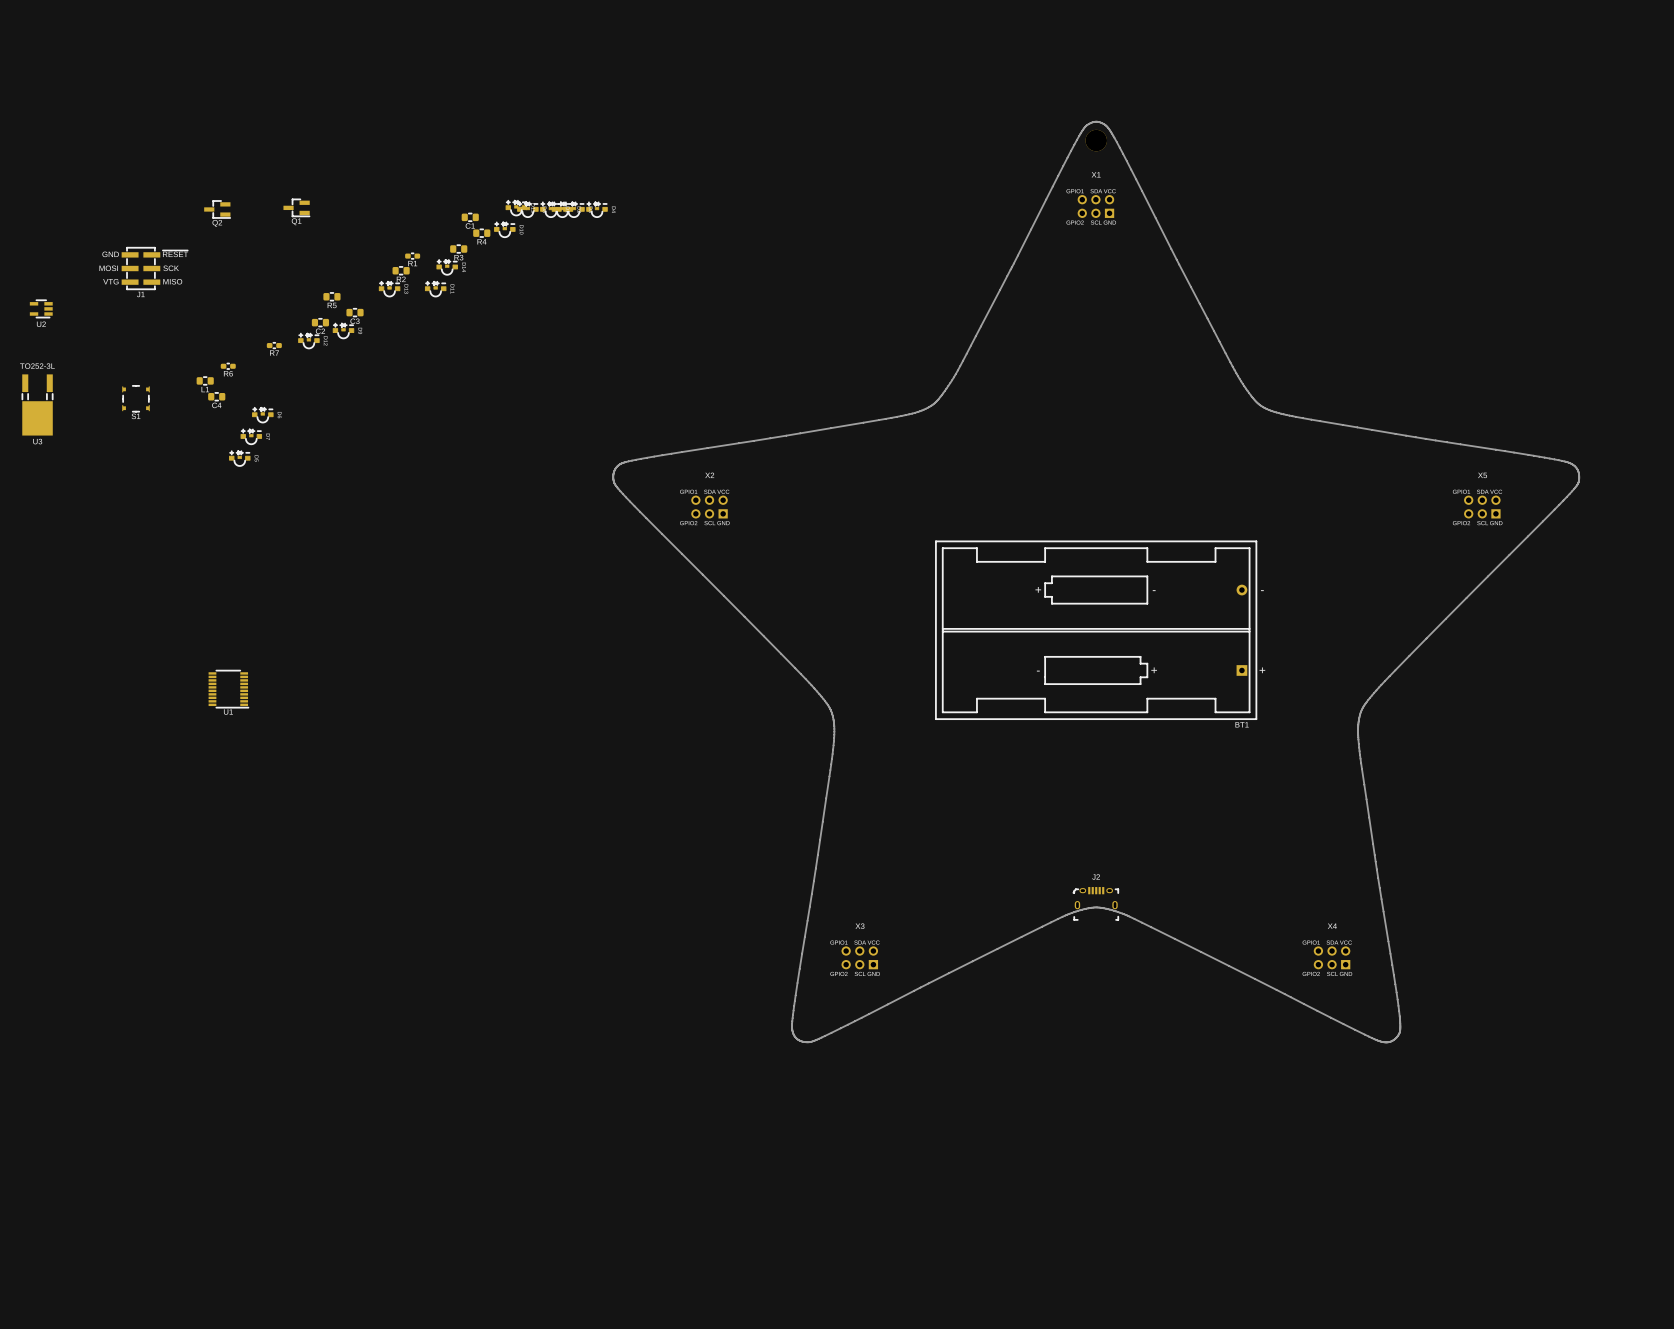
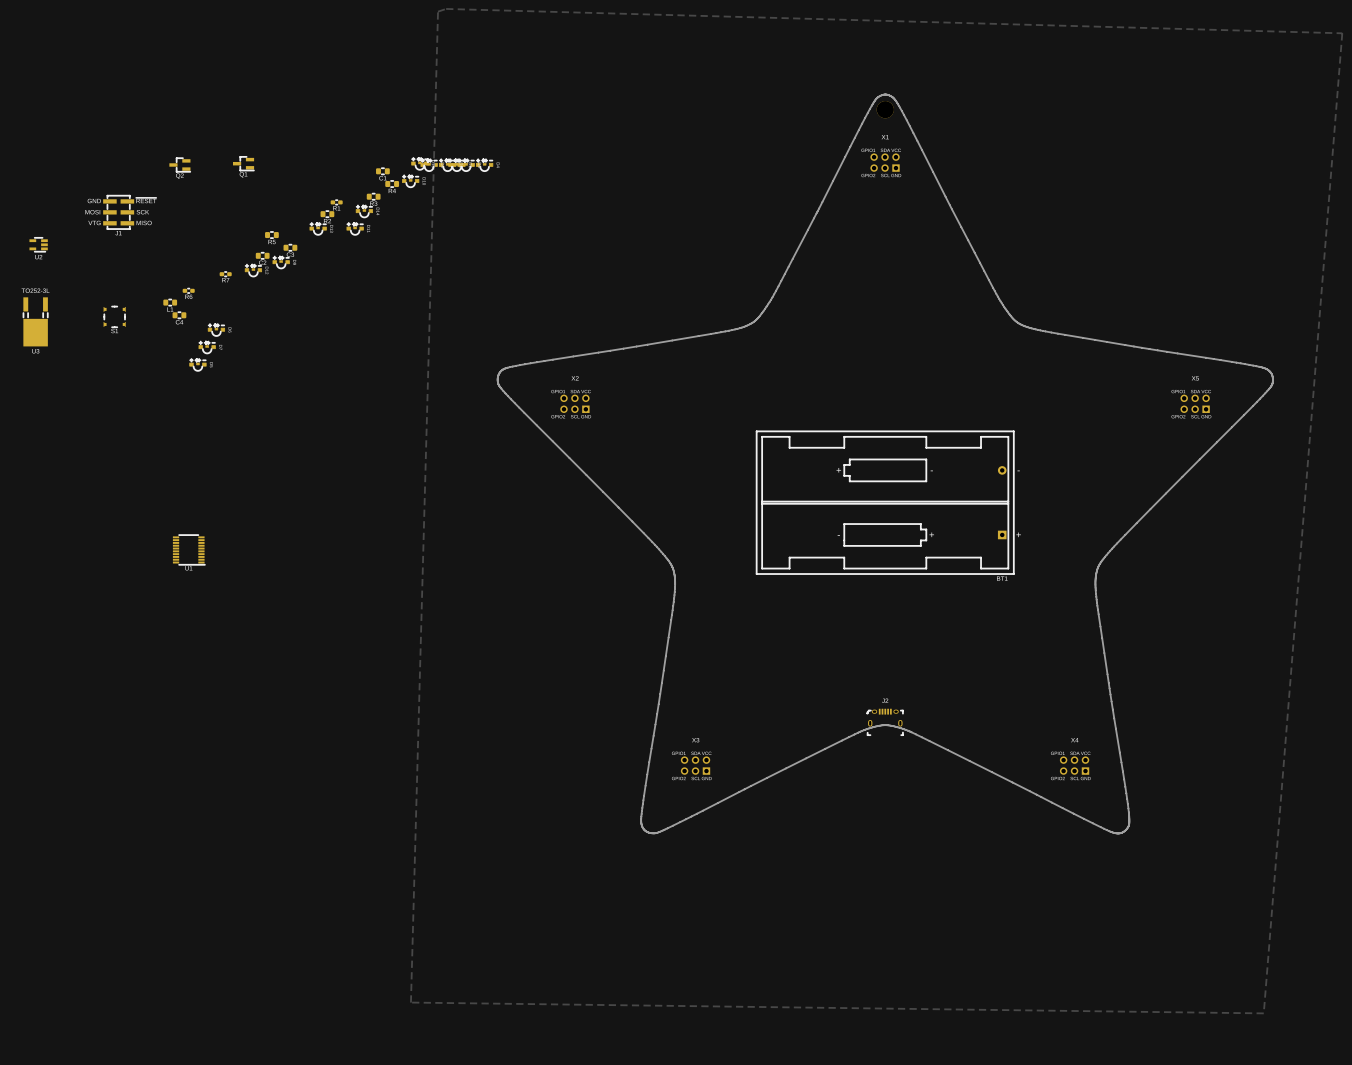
zone outline: none -> (446, 8) (1342, 33) (1263, 1013) (410, 1002) (438, 11) (446, 8)

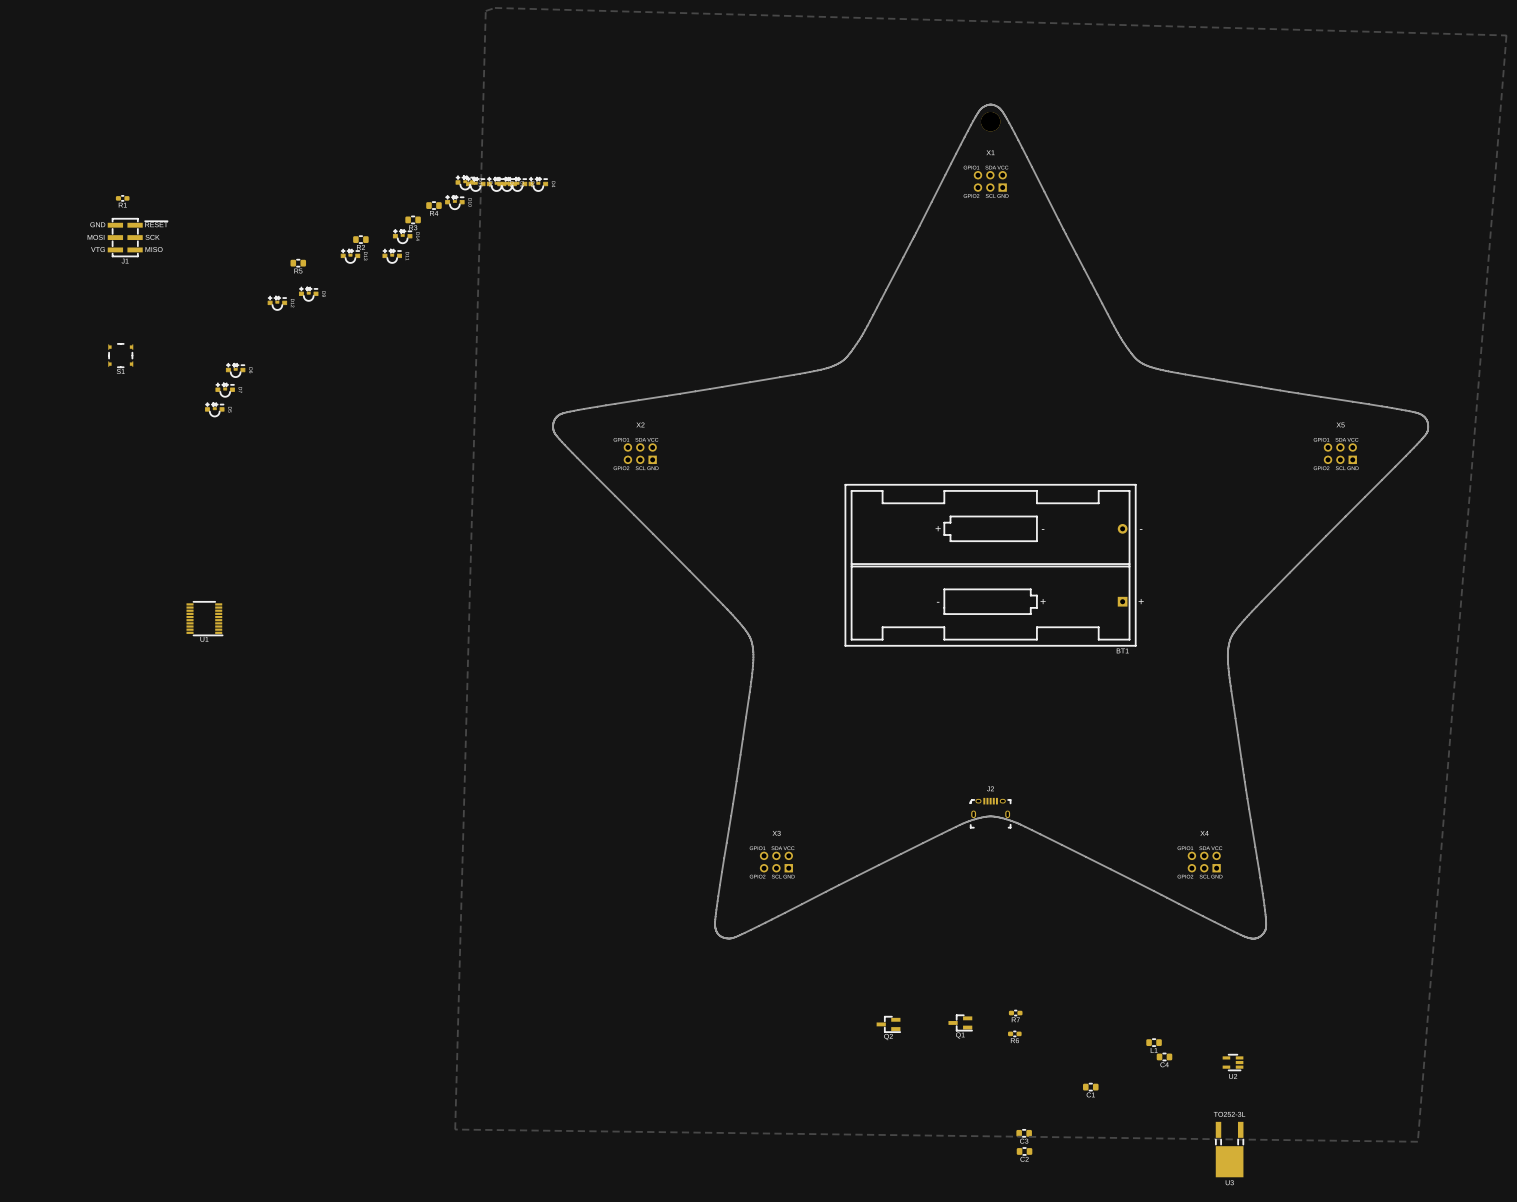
part position: (243, 163) -> (960, 1022)
part position: (179, 164) -> (888, 1024)
part position: (382, 171) -> (1090, 1087)
part position: (336, 202) -> (122, 198)
part position: (38, 244) -> (1233, 1062)
part position: (290, 247) -> (1024, 1133)
part position: (262, 255) -> (1024, 1151)
part position: (225, 274) -> (1015, 1013)
part position: (188, 290) -> (1014, 1033)
part position: (170, 302) -> (1154, 1042)
part position: (179, 315) -> (1164, 1056)
part position: (35, 321) -> (1229, 1149)

